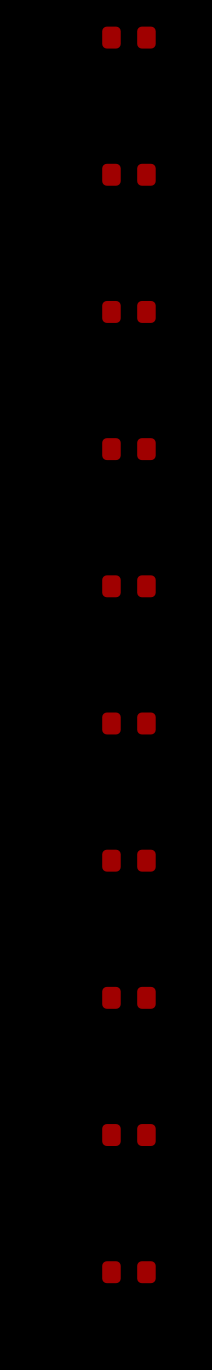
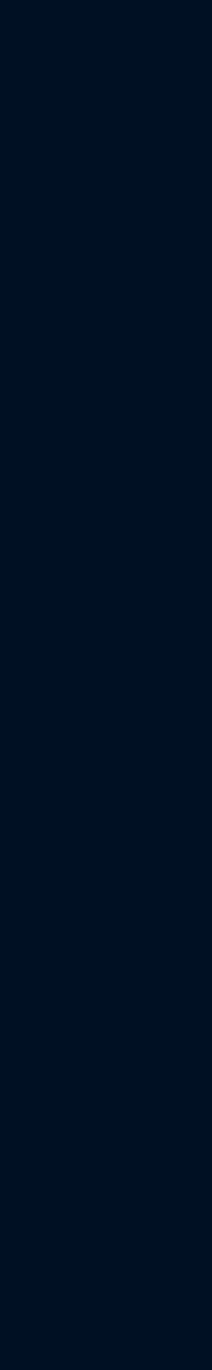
part: (128, 37) -> none
part: (128, 174) -> none
part: (128, 311) -> none
part: (128, 449) -> none
part: (128, 586) -> none
part: (128, 723) -> none
part: (128, 860) -> none
part: (128, 997) -> none
part: (128, 1135) -> none
part: (128, 1272) -> none

